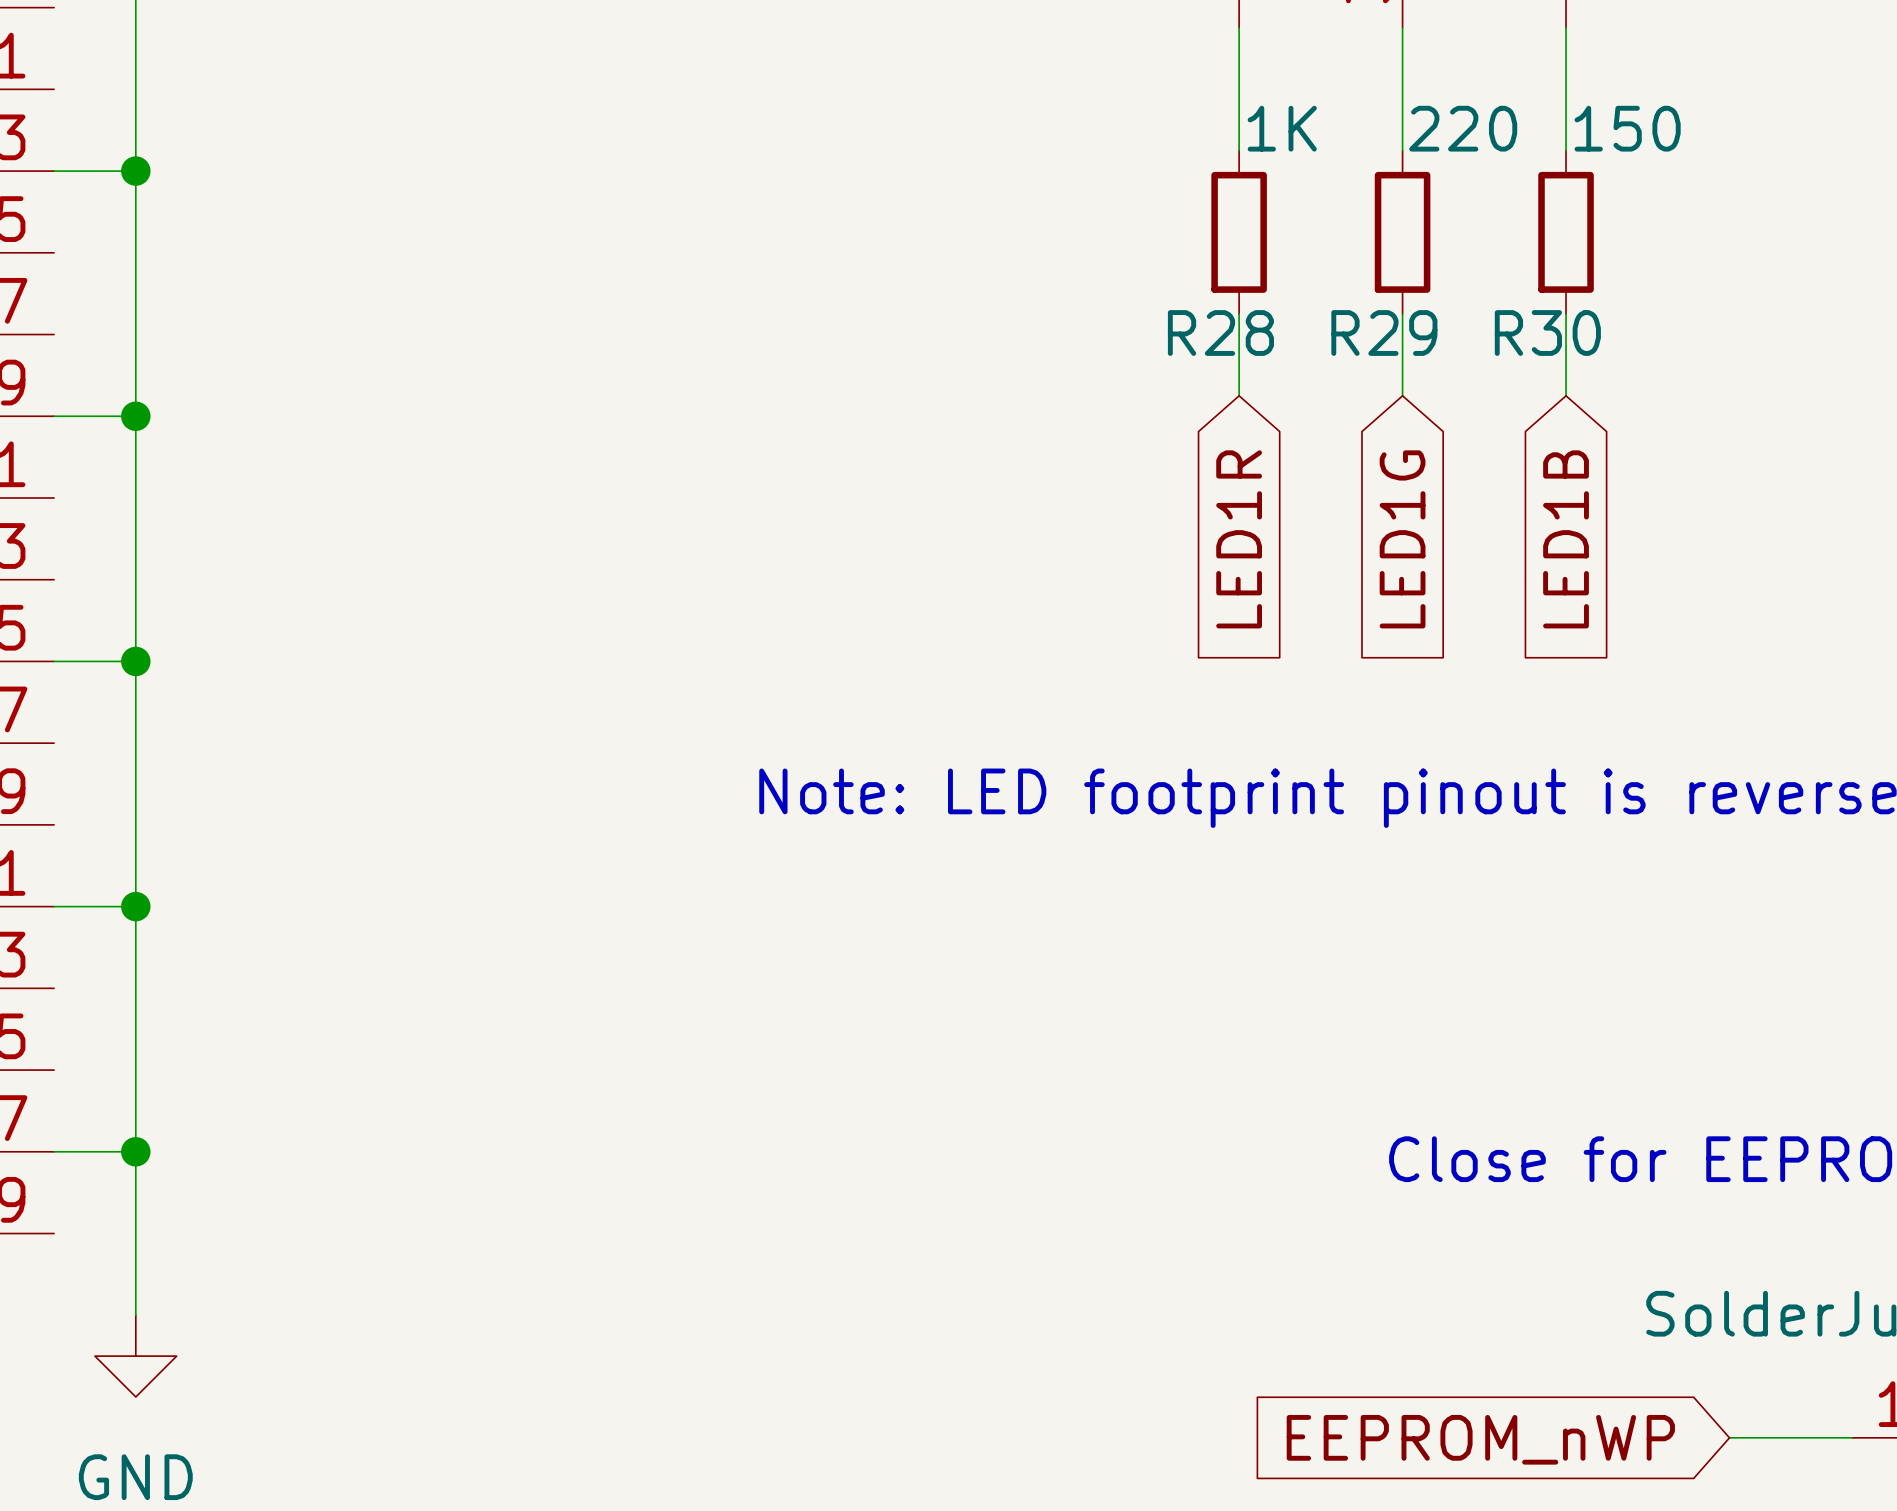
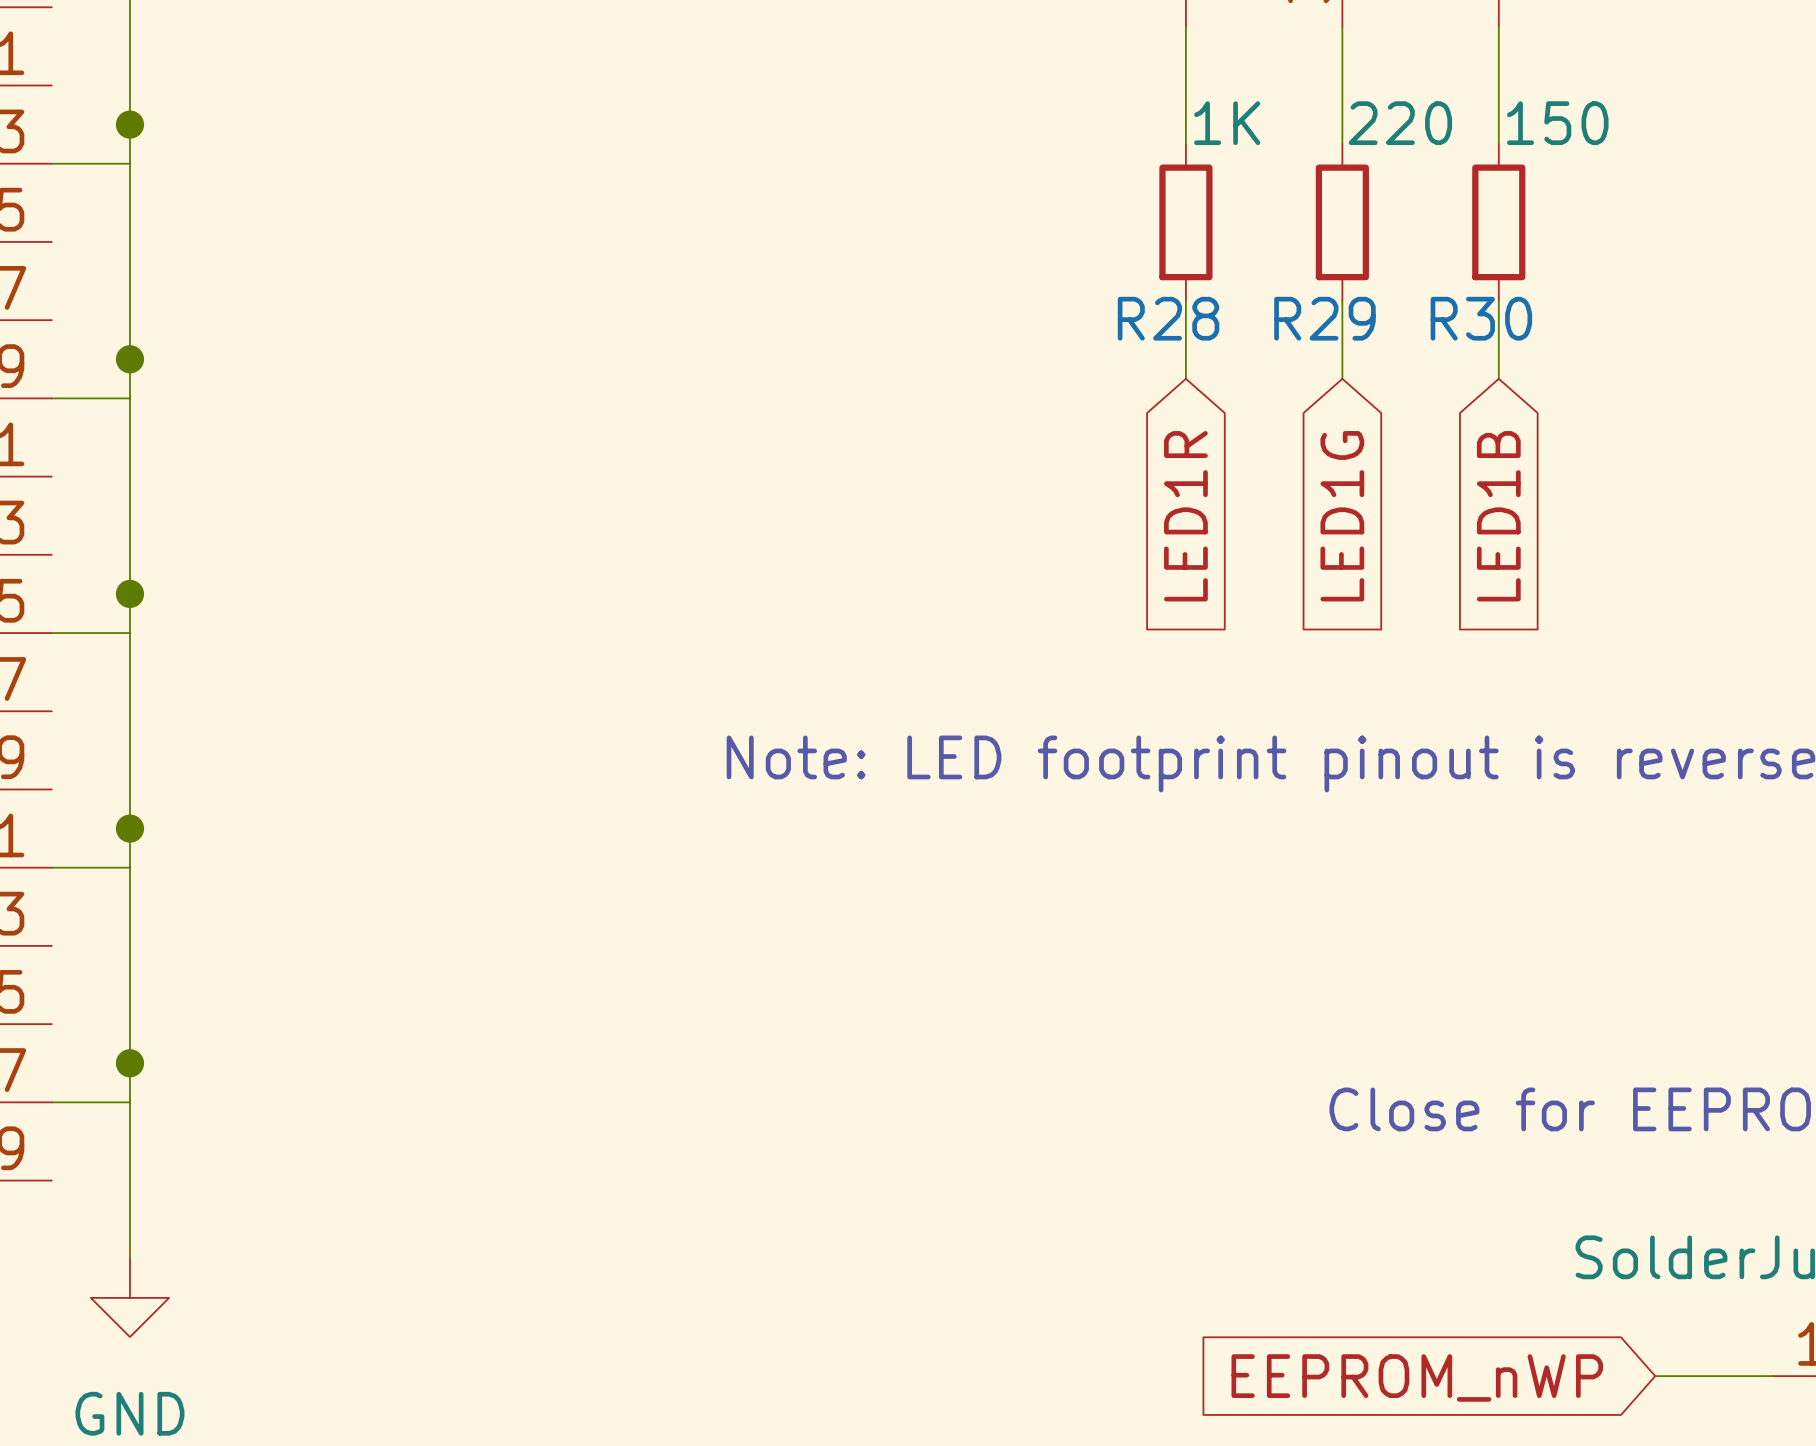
junction position: (135, 171) -> (129, 124)
junction position: (135, 416) -> (129, 359)
junction position: (135, 661) -> (129, 593)
junction position: (135, 906) -> (129, 828)
junction position: (135, 1151) -> (129, 1063)

